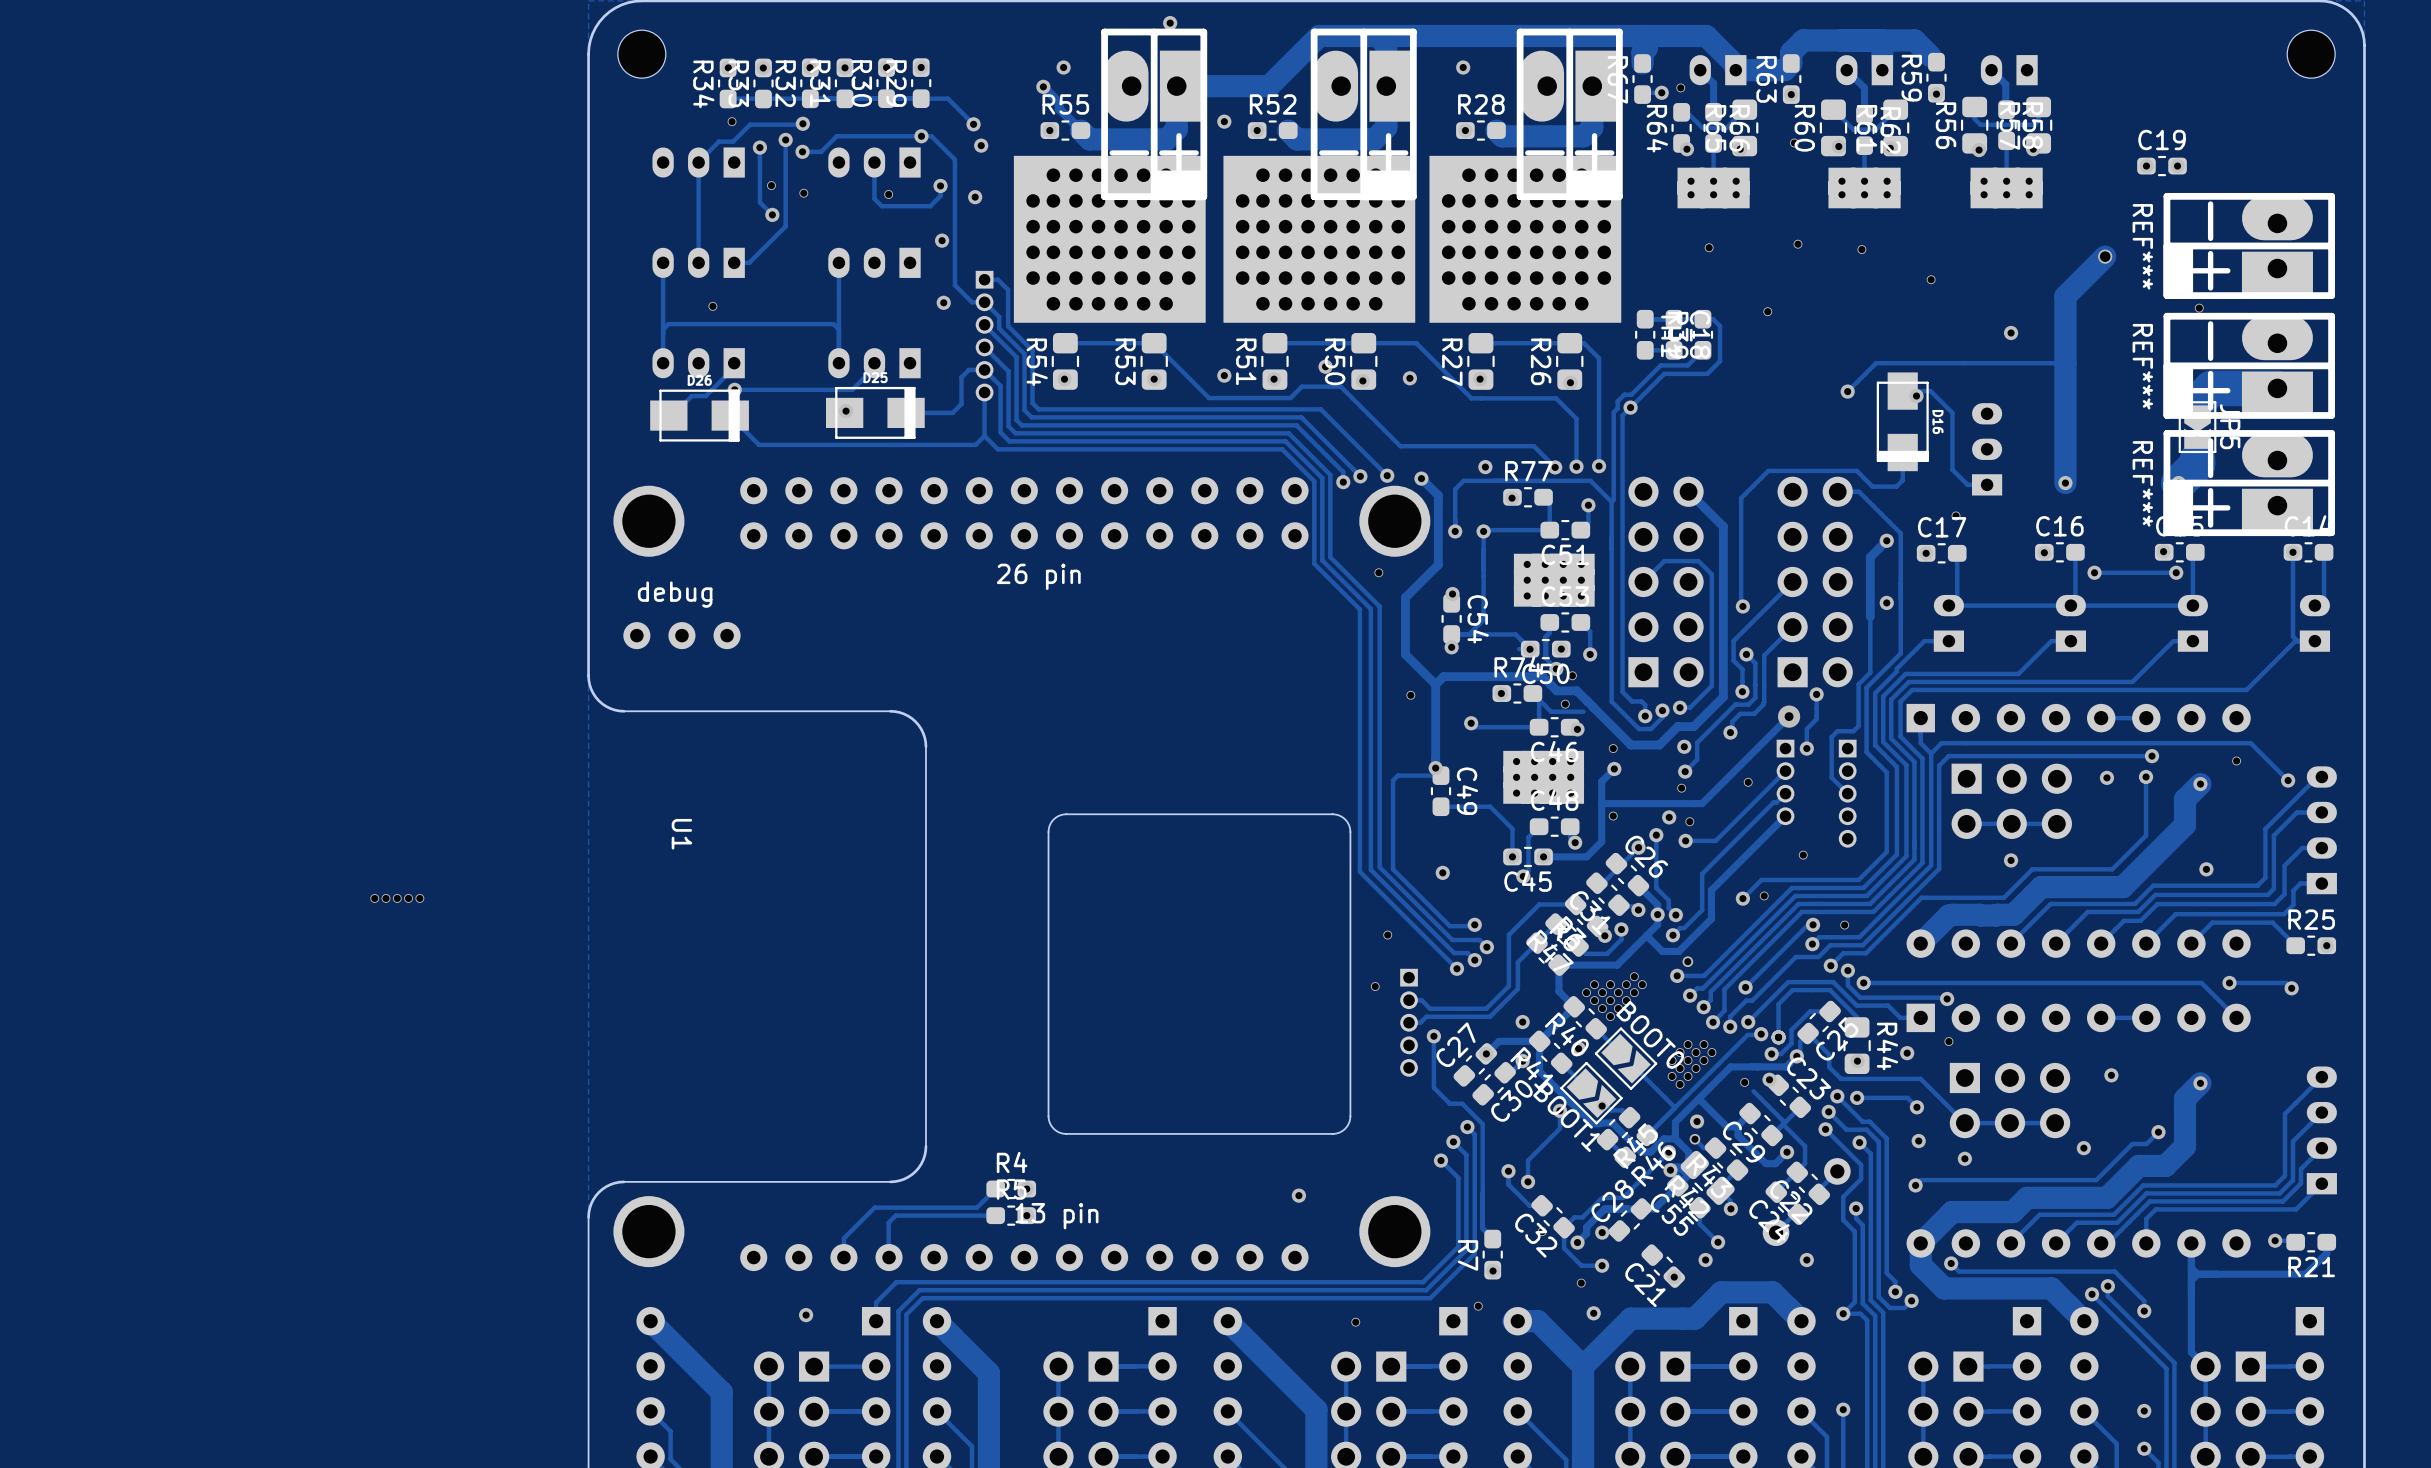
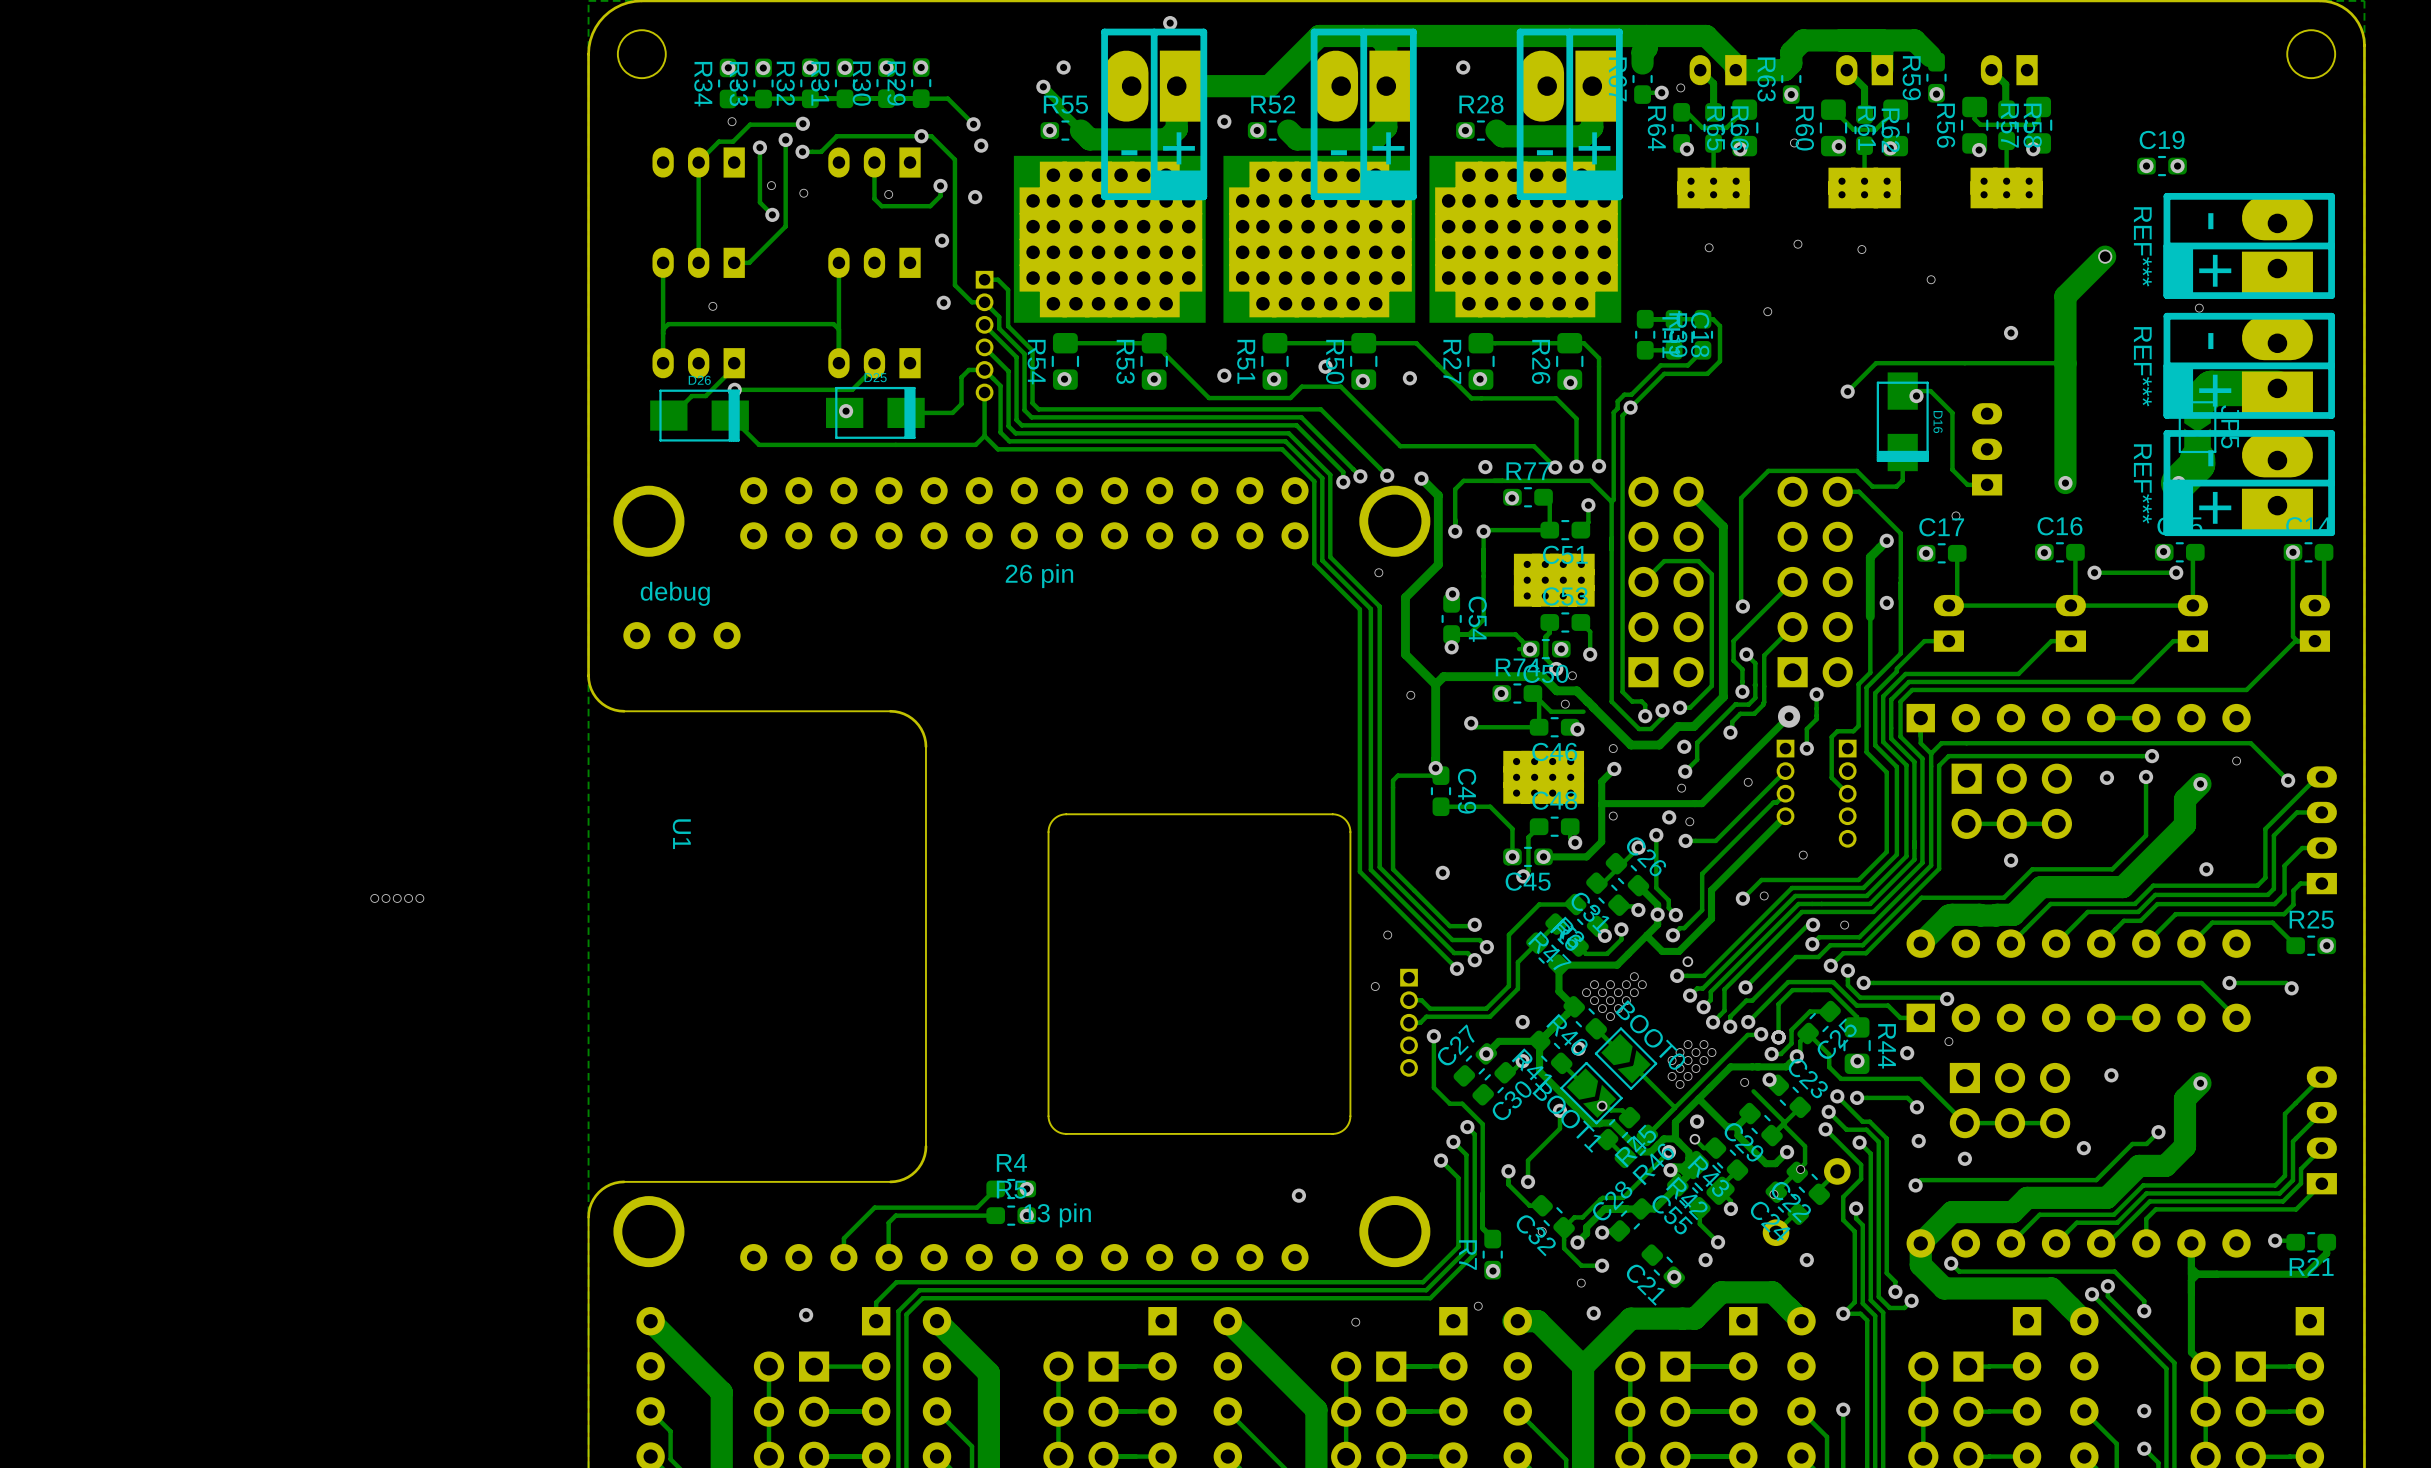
via: none -> (1800, 1169)
via: none -> (1773, 1194)

